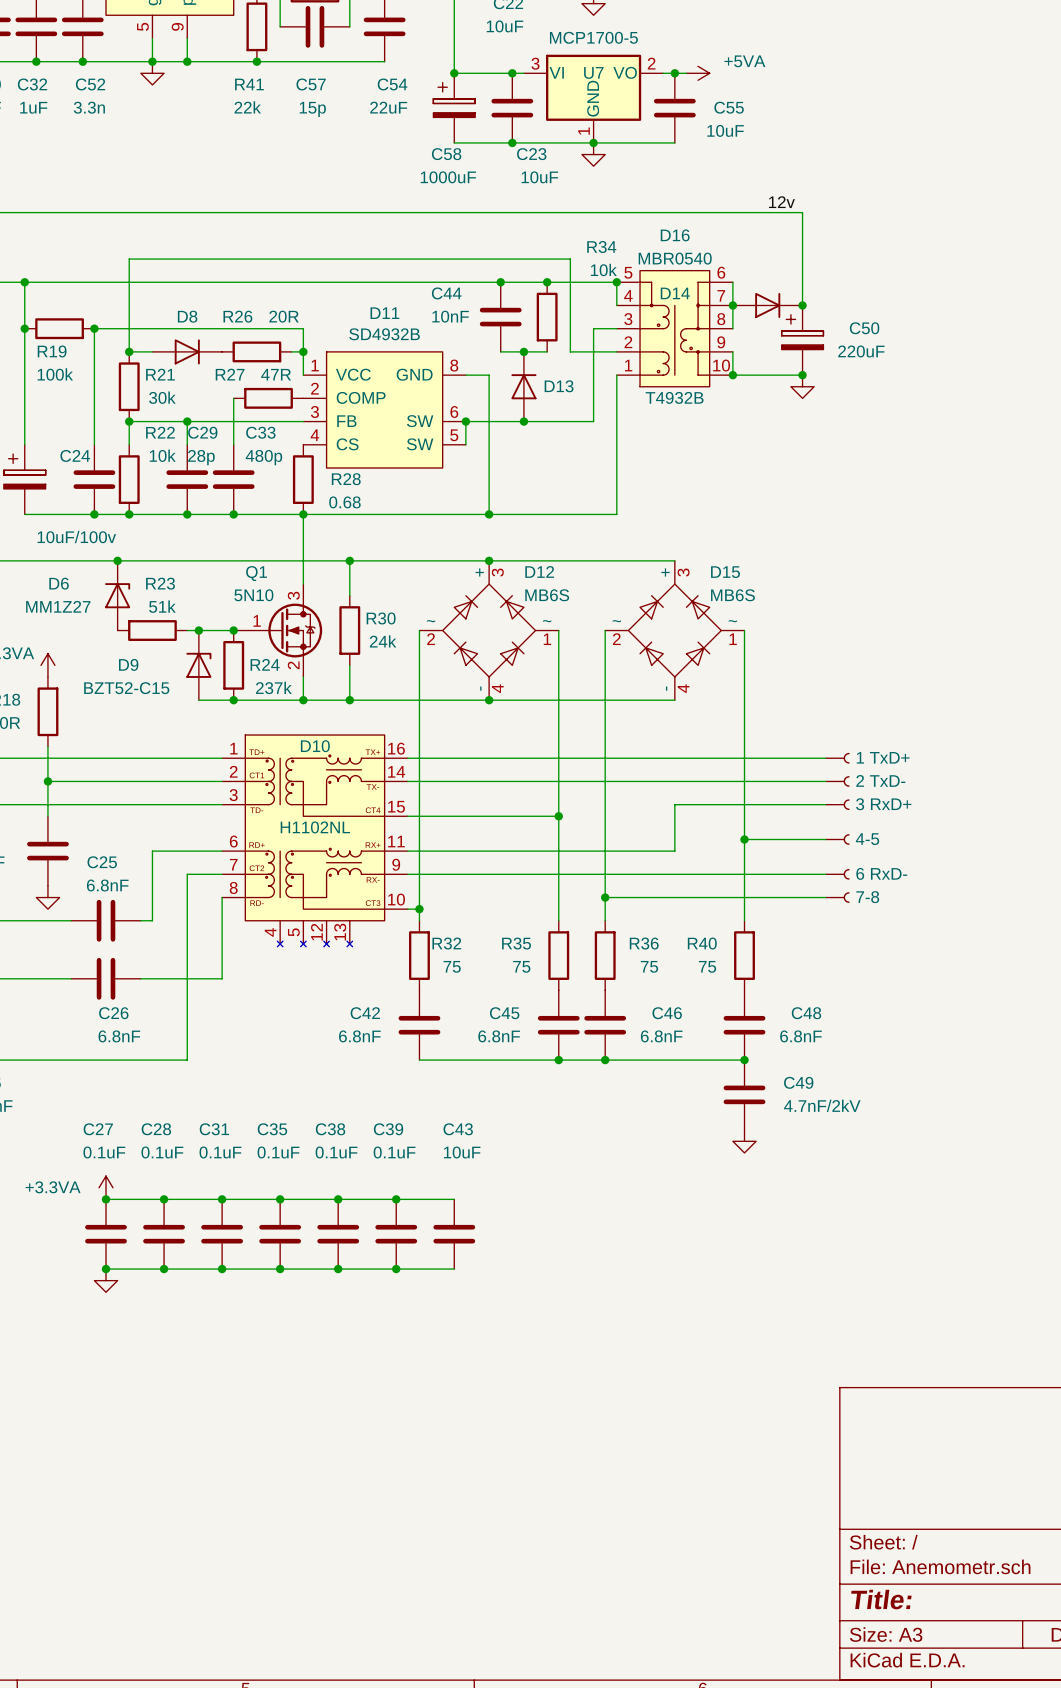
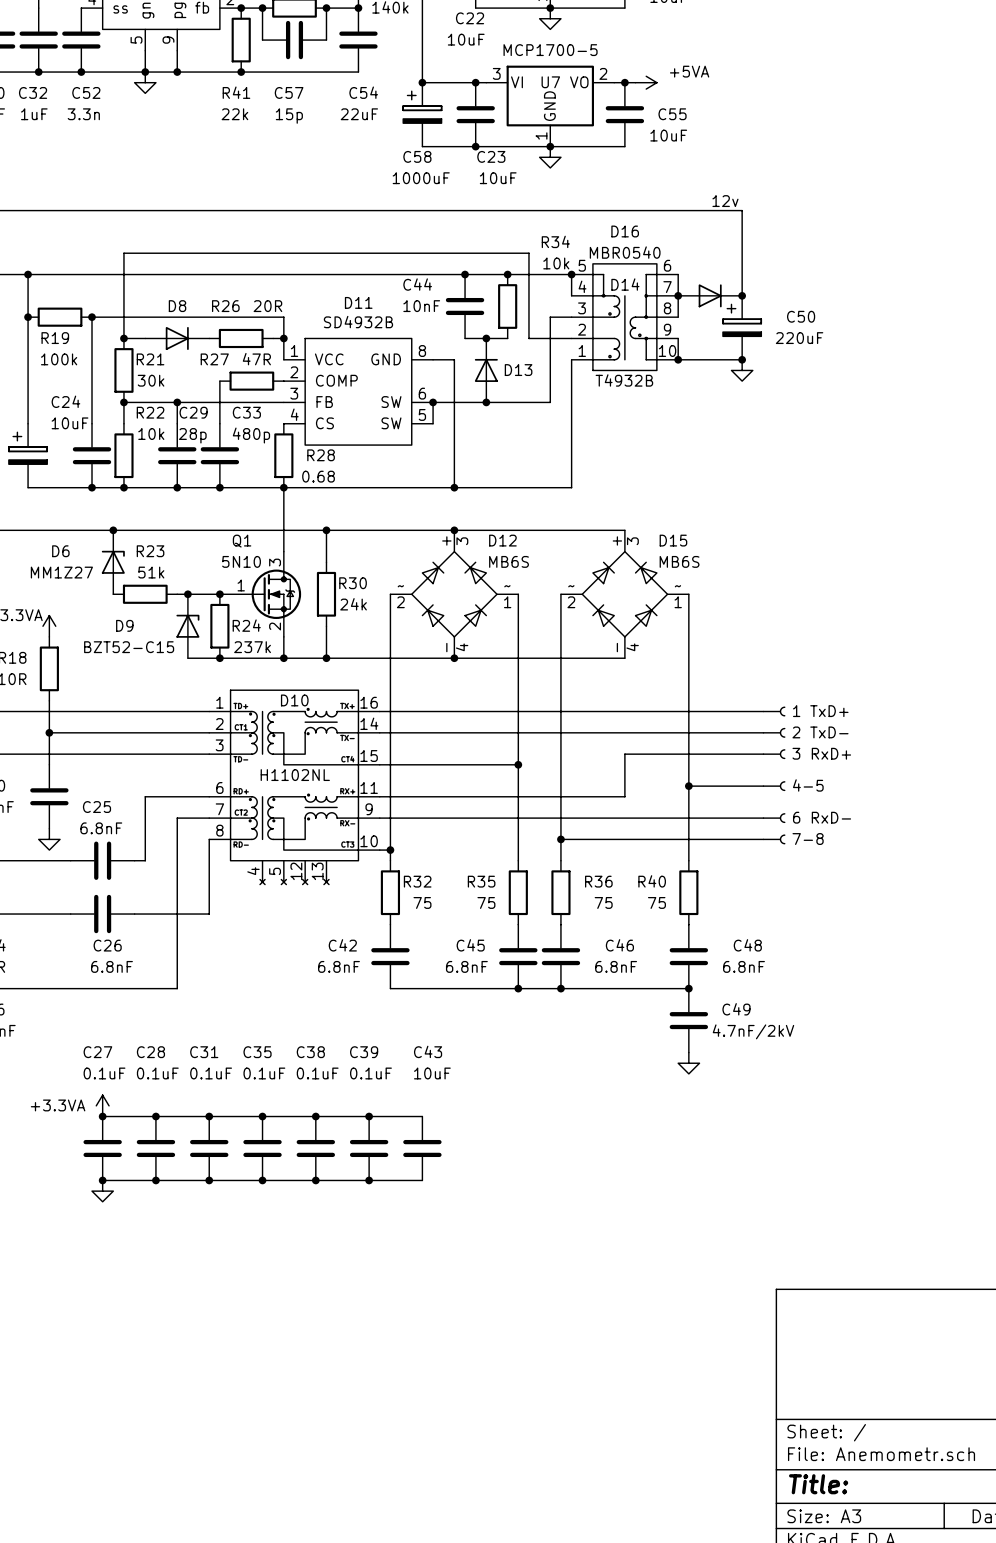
C24 name position: C24 (75, 455) -> C24 (65, 401)
C24 value: 10uF/100v (76, 537) -> 10uF (70, 423)

